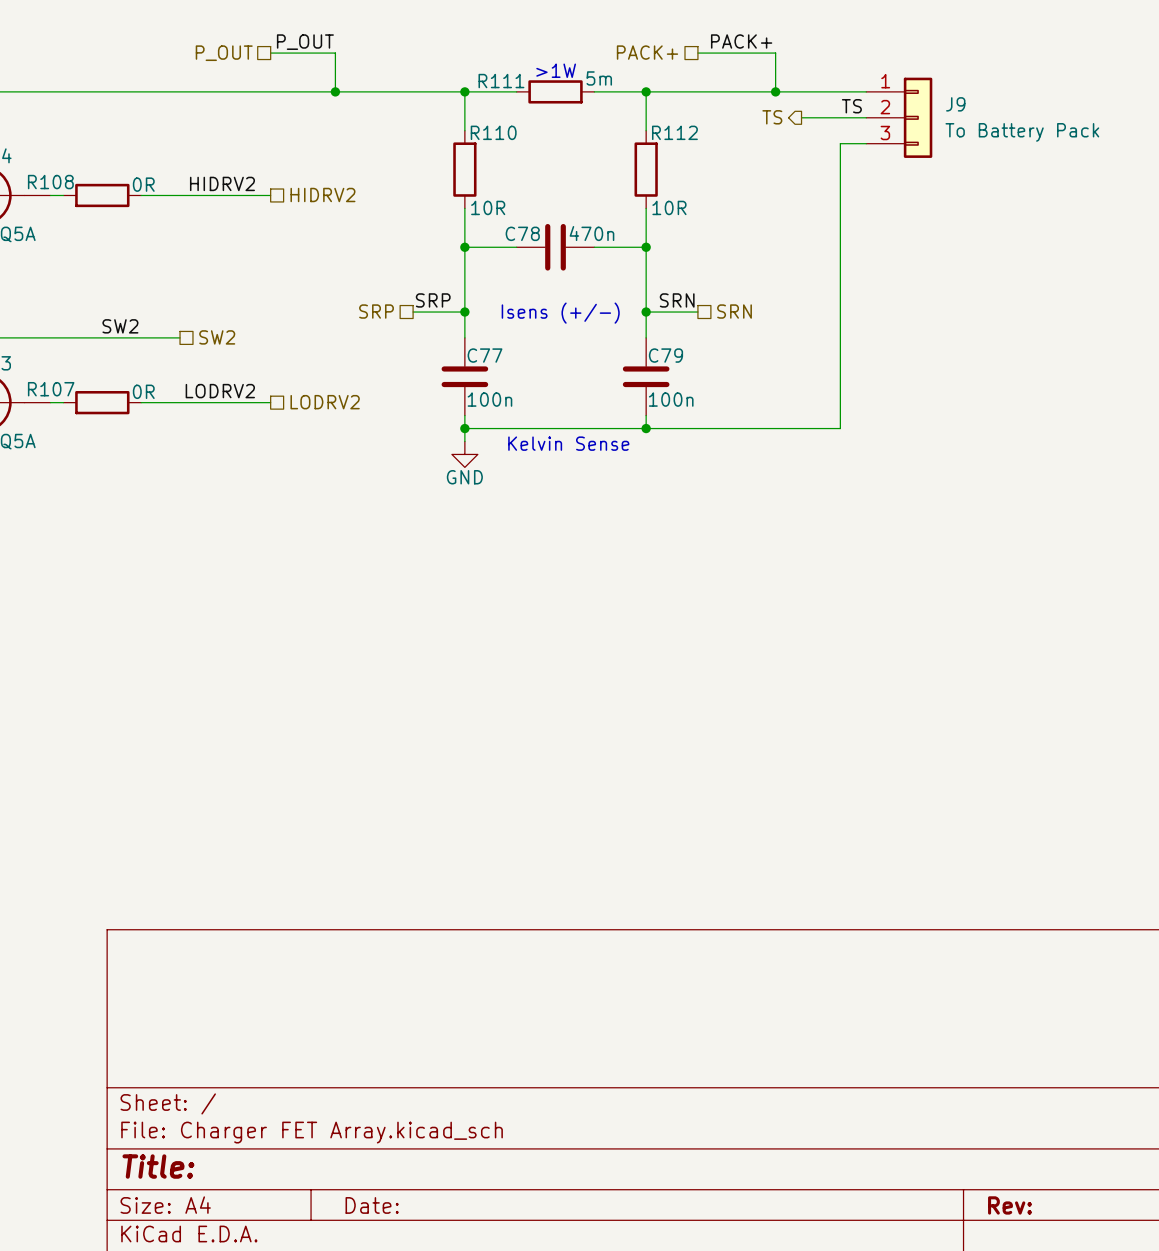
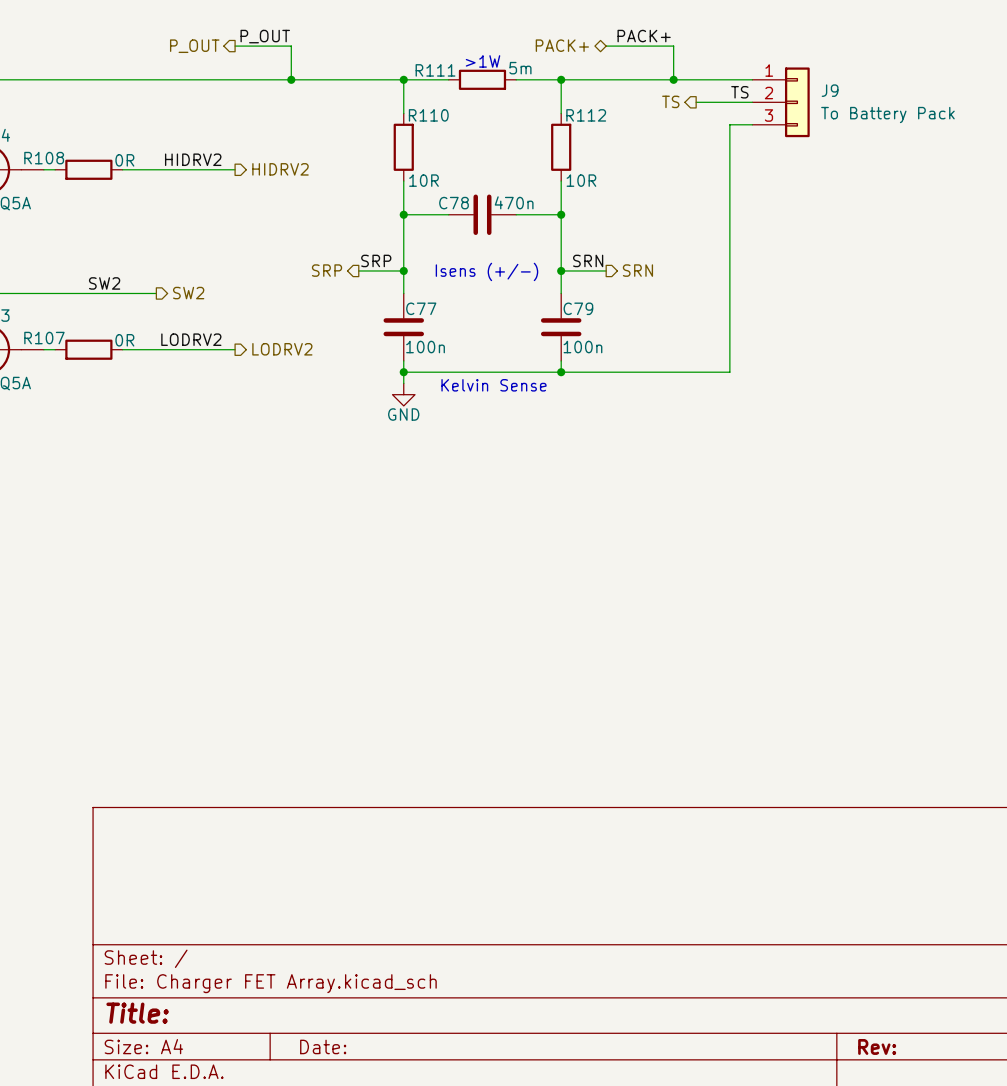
hierarchical label shape: passive (647, 52) -> bidirectional (562, 45)
hierarchical label shape: passive (224, 53) -> output (194, 46)
hierarchical label shape: passive (322, 195) -> output (280, 169)
hierarchical label shape: passive (376, 311) -> output (327, 270)
hierarchical label shape: passive (734, 311) -> output (637, 270)
hierarchical label shape: passive (217, 337) -> output (188, 293)
hierarchical label shape: passive (325, 402) -> output (282, 349)

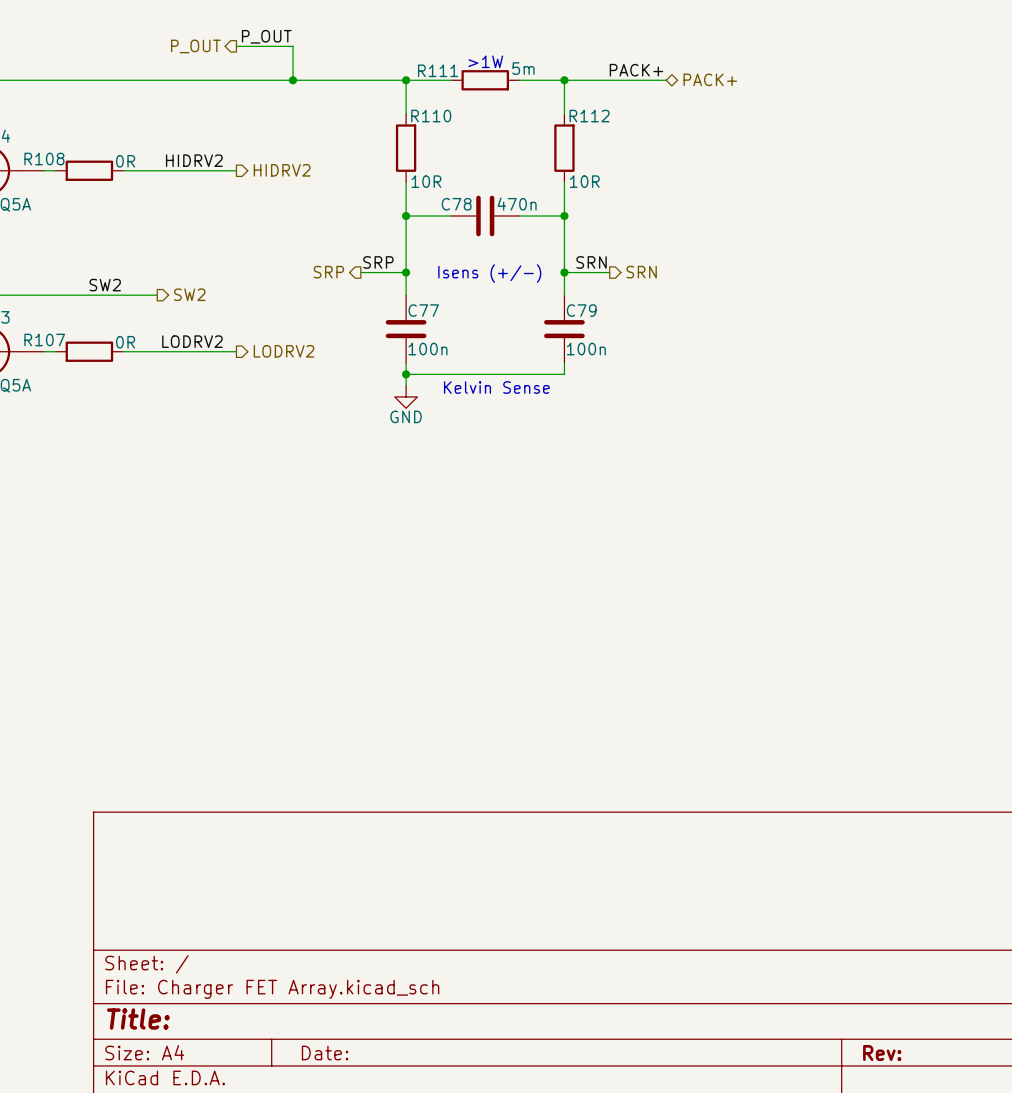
label position: PACK+ (644, 36) -> PACK+ (636, 70)
hierarchical label rotation: 0° (562, 45) -> 180° (710, 79)
hierarchical label position: PACK+ (562, 45) -> PACK+ (710, 79)
wire: (606, 46) (673, 46) (673, 79) -> none
wire: (662, 79) (752, 79) -> none
junction: (673, 79) -> none
label: TS (739, 92) -> none
hierarchical label: TS (670, 101) -> none
wire: (696, 102) (752, 102) -> none
J9: To Battery Pack (781, 102) -> none
wire: (752, 124) (729, 124) (729, 372) (561, 372) -> none
junction: (561, 372) -> none

